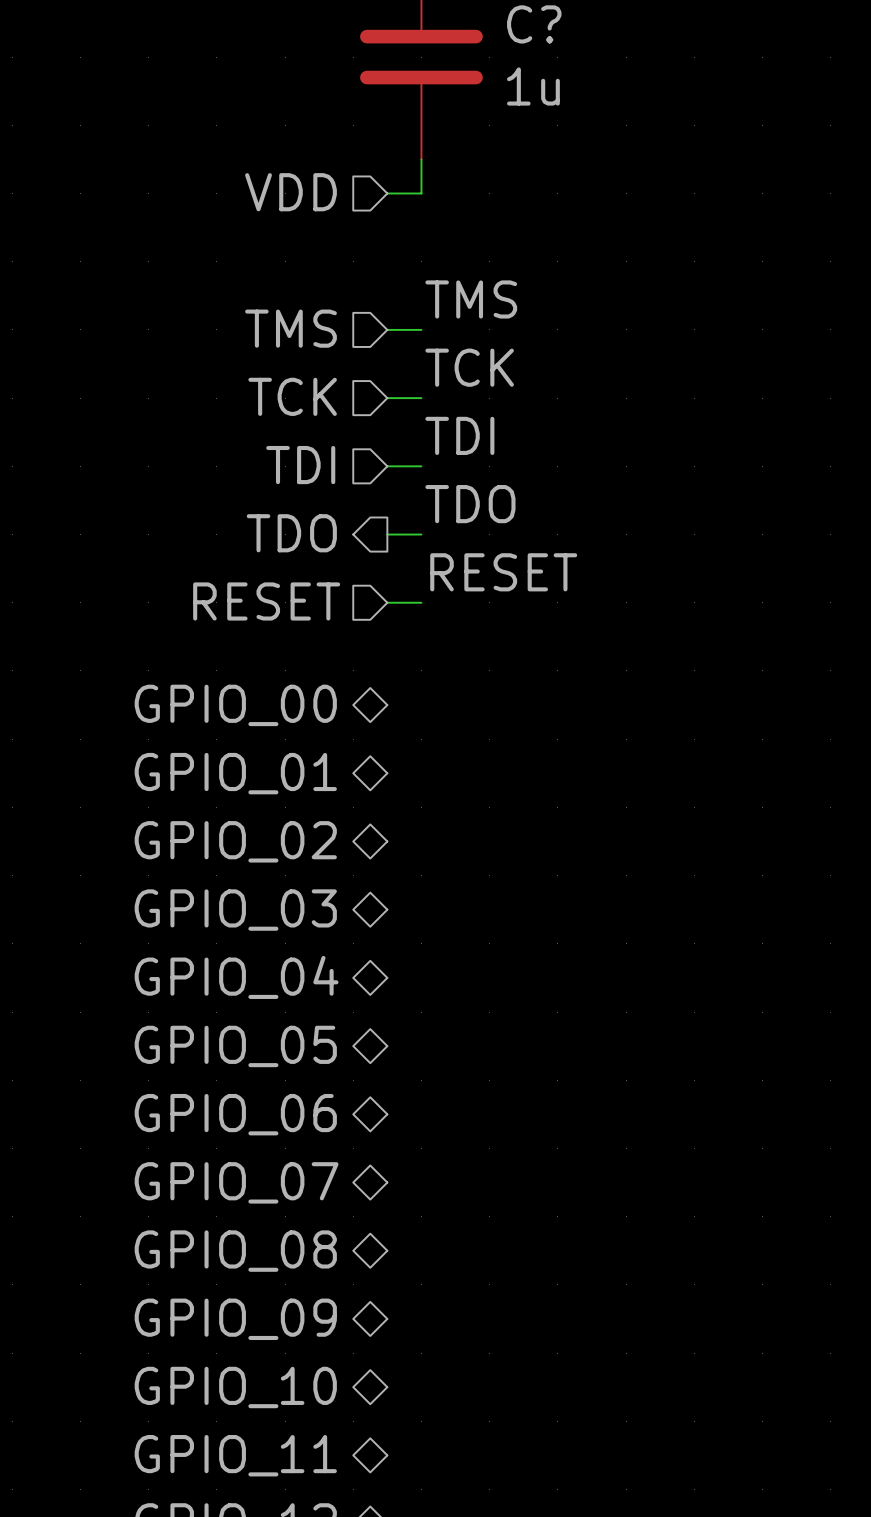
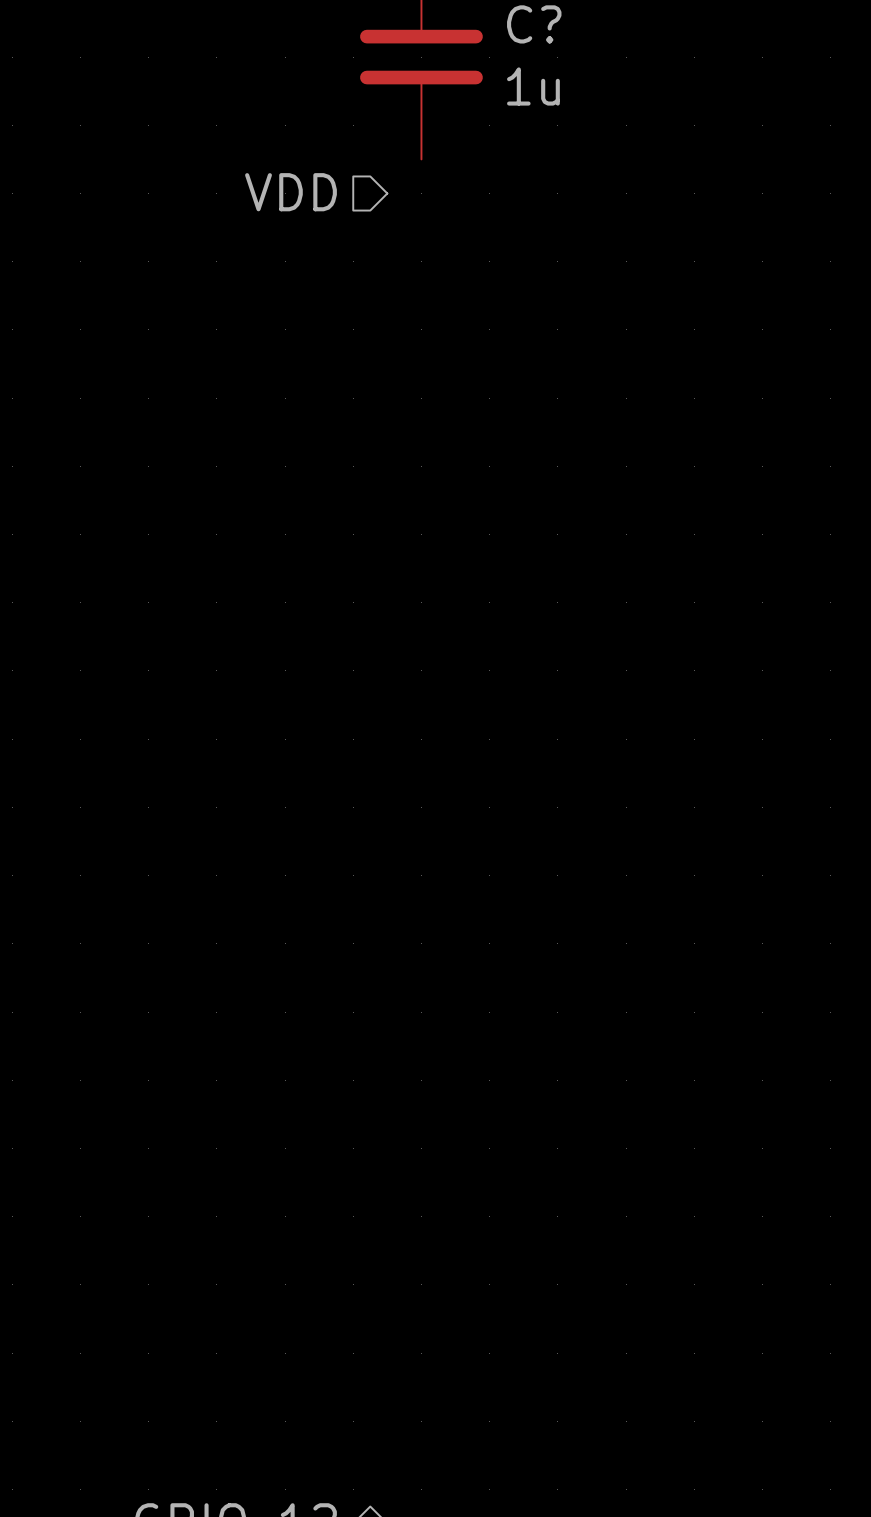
wire: (421, 159) (421, 193) (387, 193) -> none
label: TMS (471, 299) -> none
hierarchical label: TMS (291, 328) -> none
wire: (387, 329) (421, 329) -> none
label: TCK (469, 367) -> none
hierarchical label: TCK (292, 396) -> none
wire: (387, 398) (421, 398) -> none
label: TDI (459, 435) -> none
hierarchical label: TDI (300, 465) -> none
wire: (387, 466) (421, 466) -> none
label: TDO (470, 504) -> none
hierarchical label: TDO (291, 533) -> none
wire: (387, 534) (421, 534) -> none
label: RESET (503, 572) -> none
hierarchical label: RESET (266, 601) -> none
wire: (387, 602) (421, 602) -> none
hierarchical label: GPIO_00 (235, 705) -> none
hierarchical label: GPIO_01 (235, 773) -> none
hierarchical label: GPIO_02 (235, 841) -> none
hierarchical label: GPIO_03 (235, 910) -> none
hierarchical label: GPIO_04 (236, 977) -> none
hierarchical label: GPIO_05 (235, 1046) -> none
hierarchical label: GPIO_06 (235, 1114) -> none
hierarchical label: GPIO_07 (236, 1182) -> none
hierarchical label: GPIO_08 (235, 1251) -> none
hierarchical label: GPIO_09 (235, 1319) -> none
hierarchical label: GPIO_10 (235, 1387) -> none
hierarchical label: GPIO_11 (235, 1455) -> none

